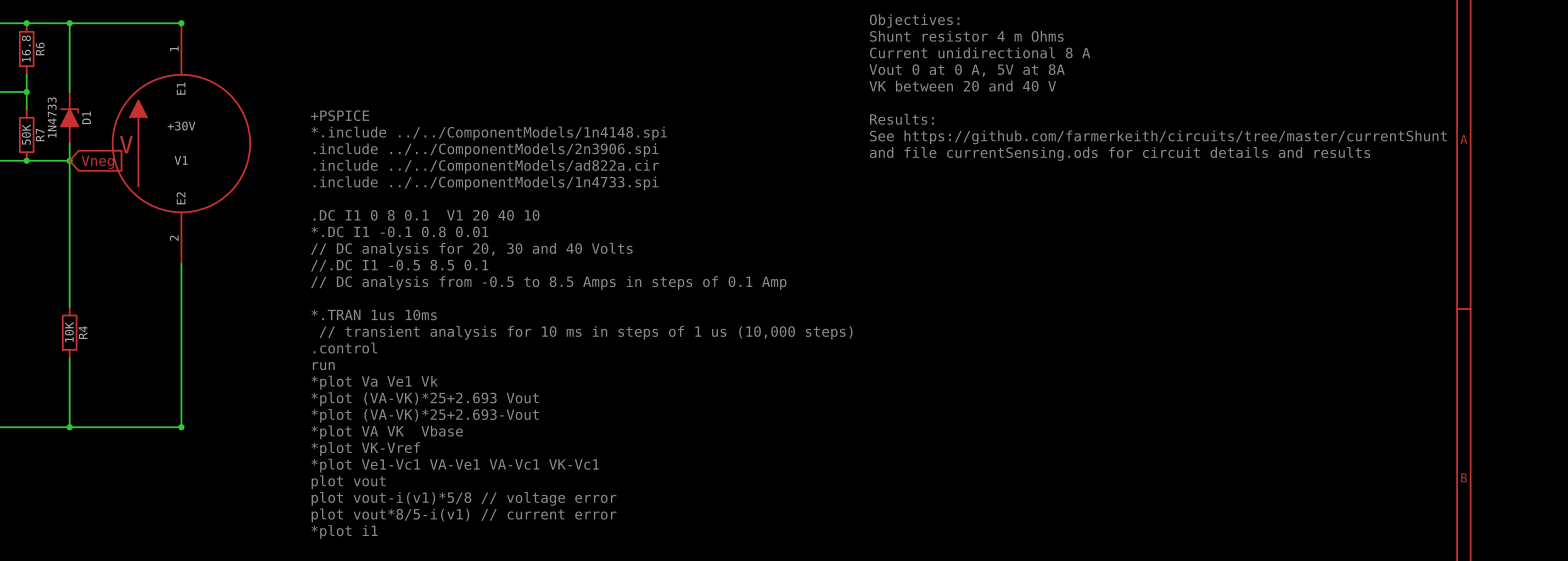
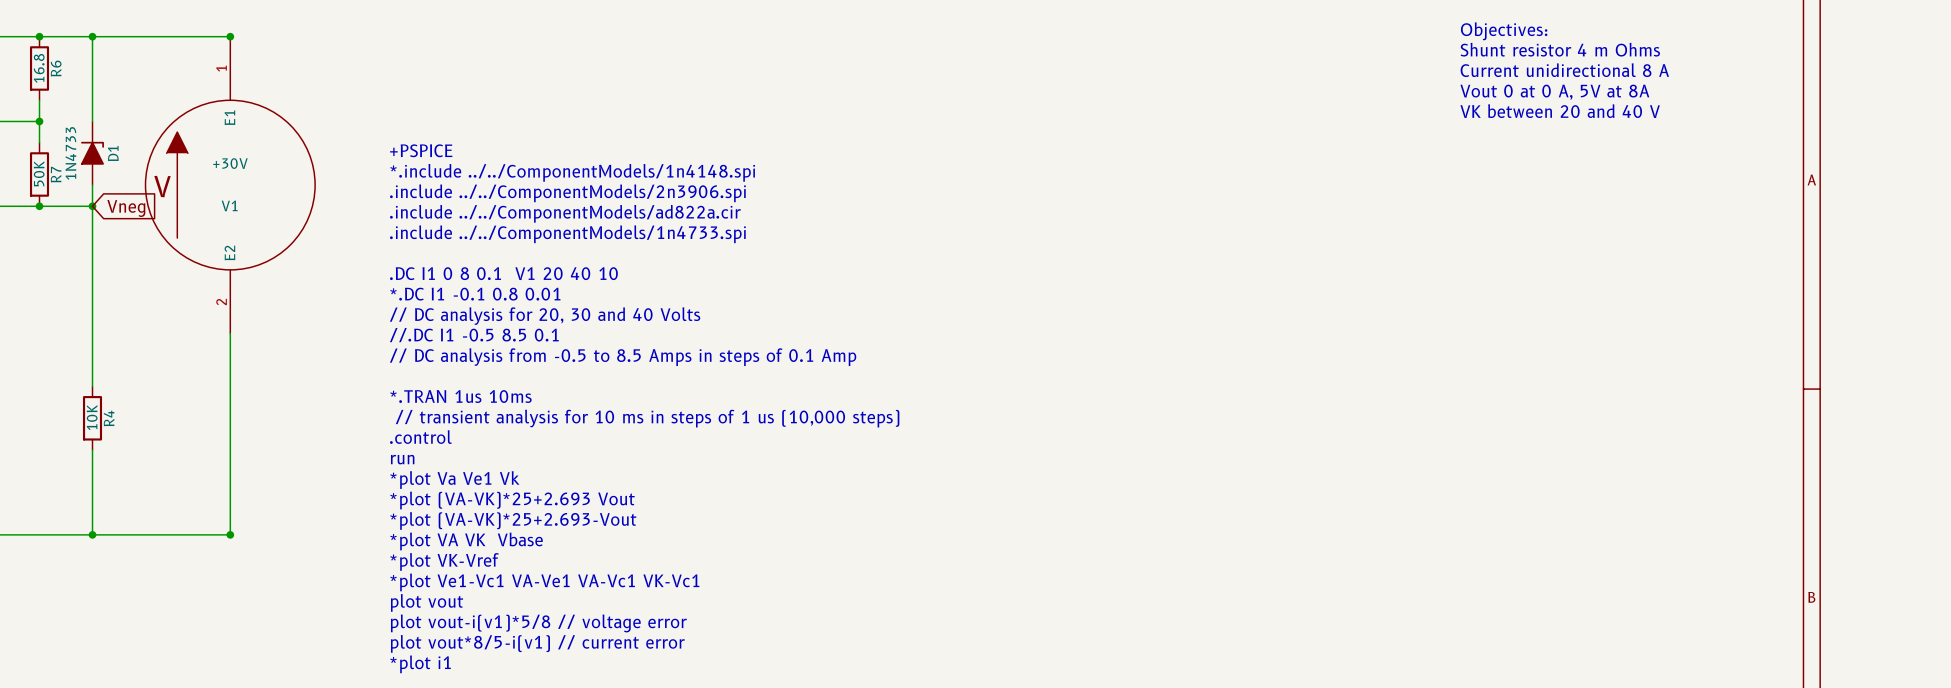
text: none -> Objectives: (1504, 31)
text: Objectives: (914, 21) -> none
text: none -> Shunt resistor 4 m Ohms (1560, 49)
text: Shunt resistor 4 m Ohms (966, 36) -> none
text: none -> Current unidirectional 8 A (1564, 70)
text: Current unidirectional 8 A (980, 52) -> none
text: none -> Vout 0 at 0 A, 5V at 8A (1554, 92)
text: Vout 0 at 0 A, 5V at 8A (967, 70) -> none
text: none -> VK between 20 and 40 V (1560, 111)
text: VK between 20 and 40 V (962, 86) -> none
text: Results: (901, 119) -> none
text: See https://github.com/farmerkeith/circuits/tree/master/currentShunt (1158, 137) -> none
text: and file currentSensing.ods for circuit details and results (1120, 153) -> none

